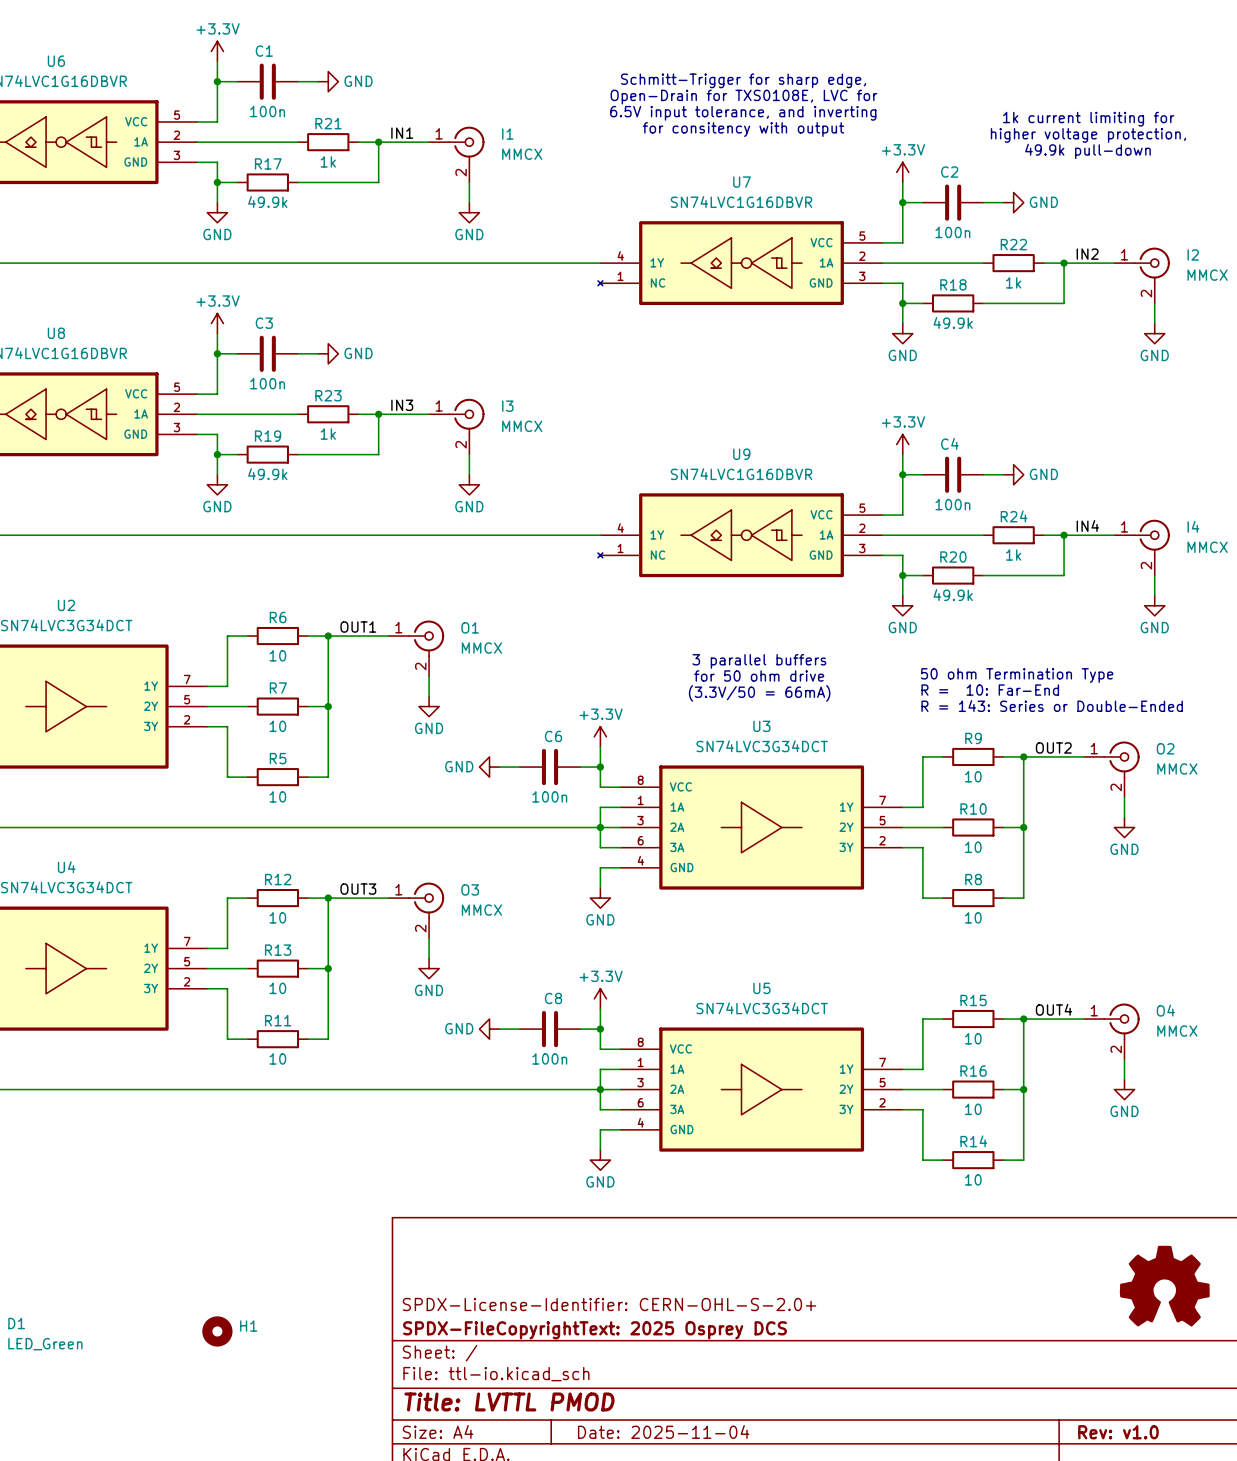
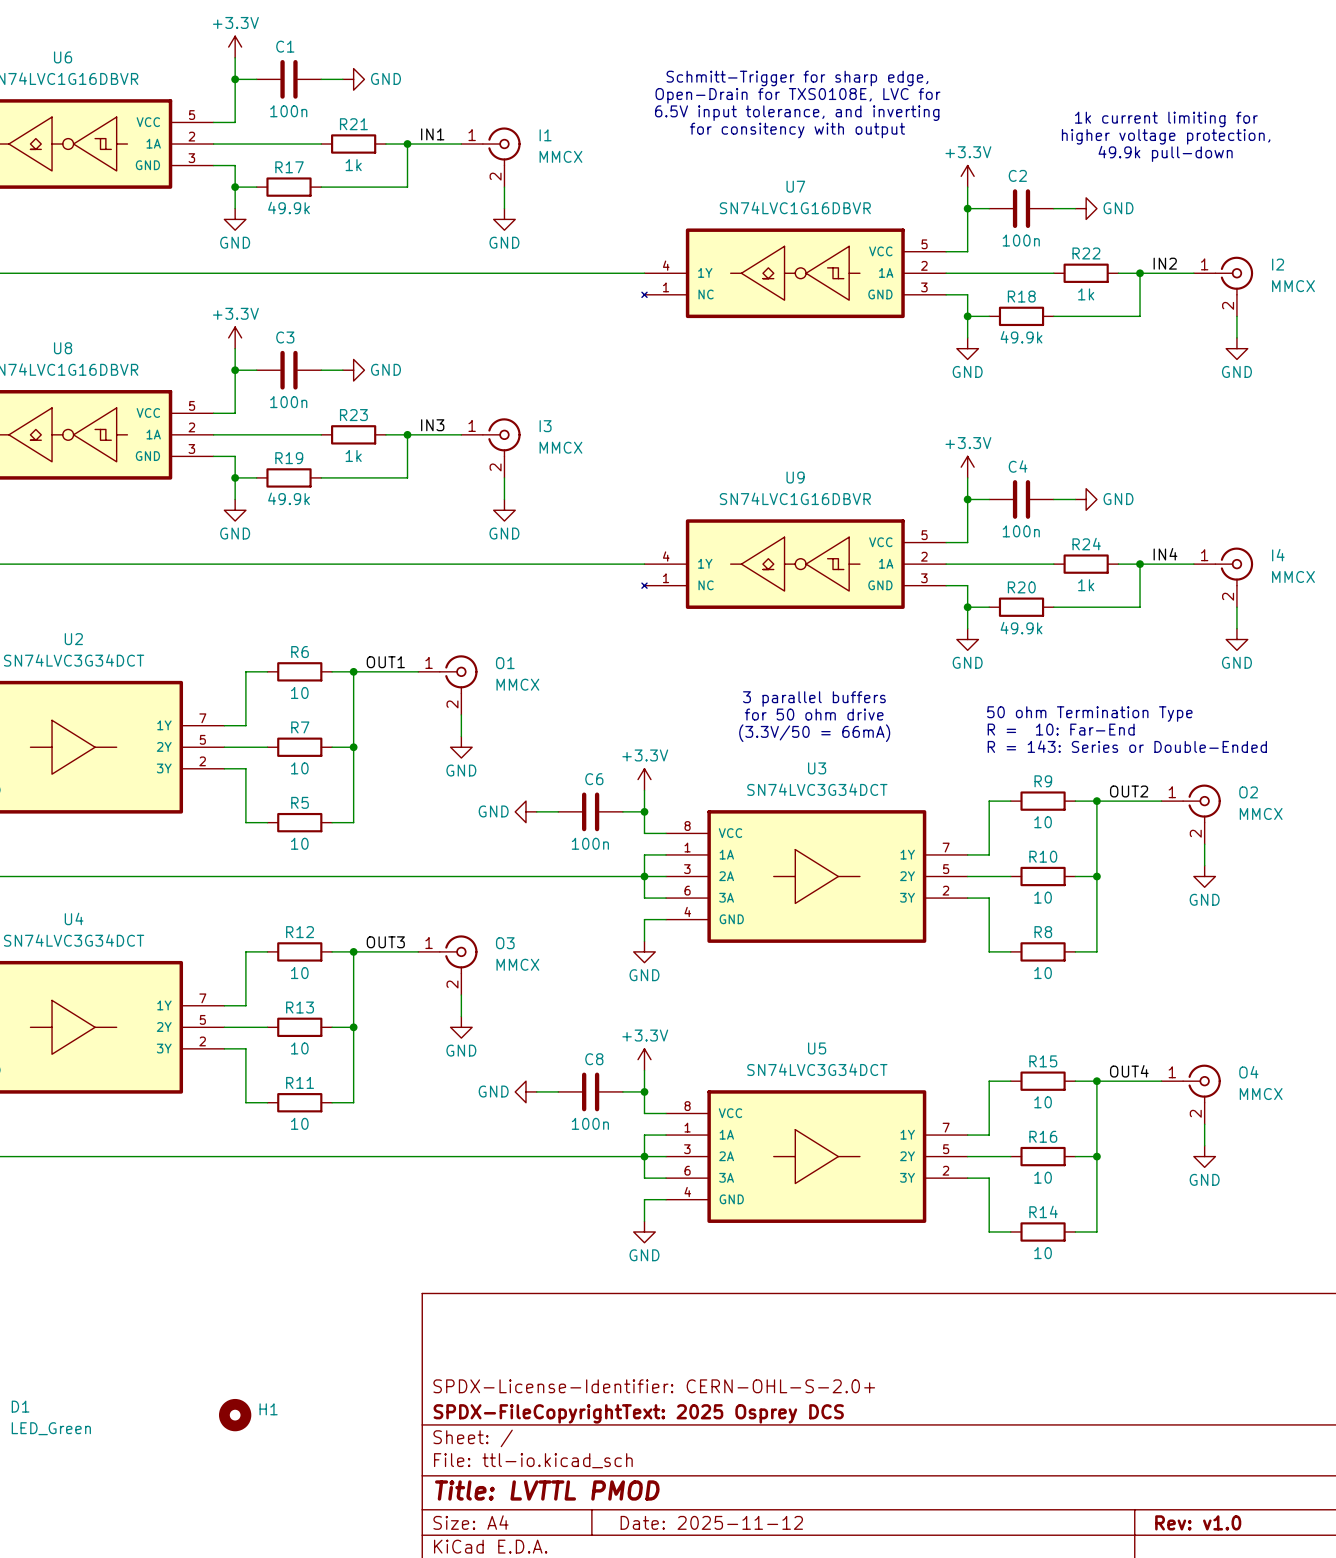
part: (1164, 1286) -> none
title block: Date: 2025-11-04 (663, 1431) -> Date: 2025-11-12 (711, 1522)

